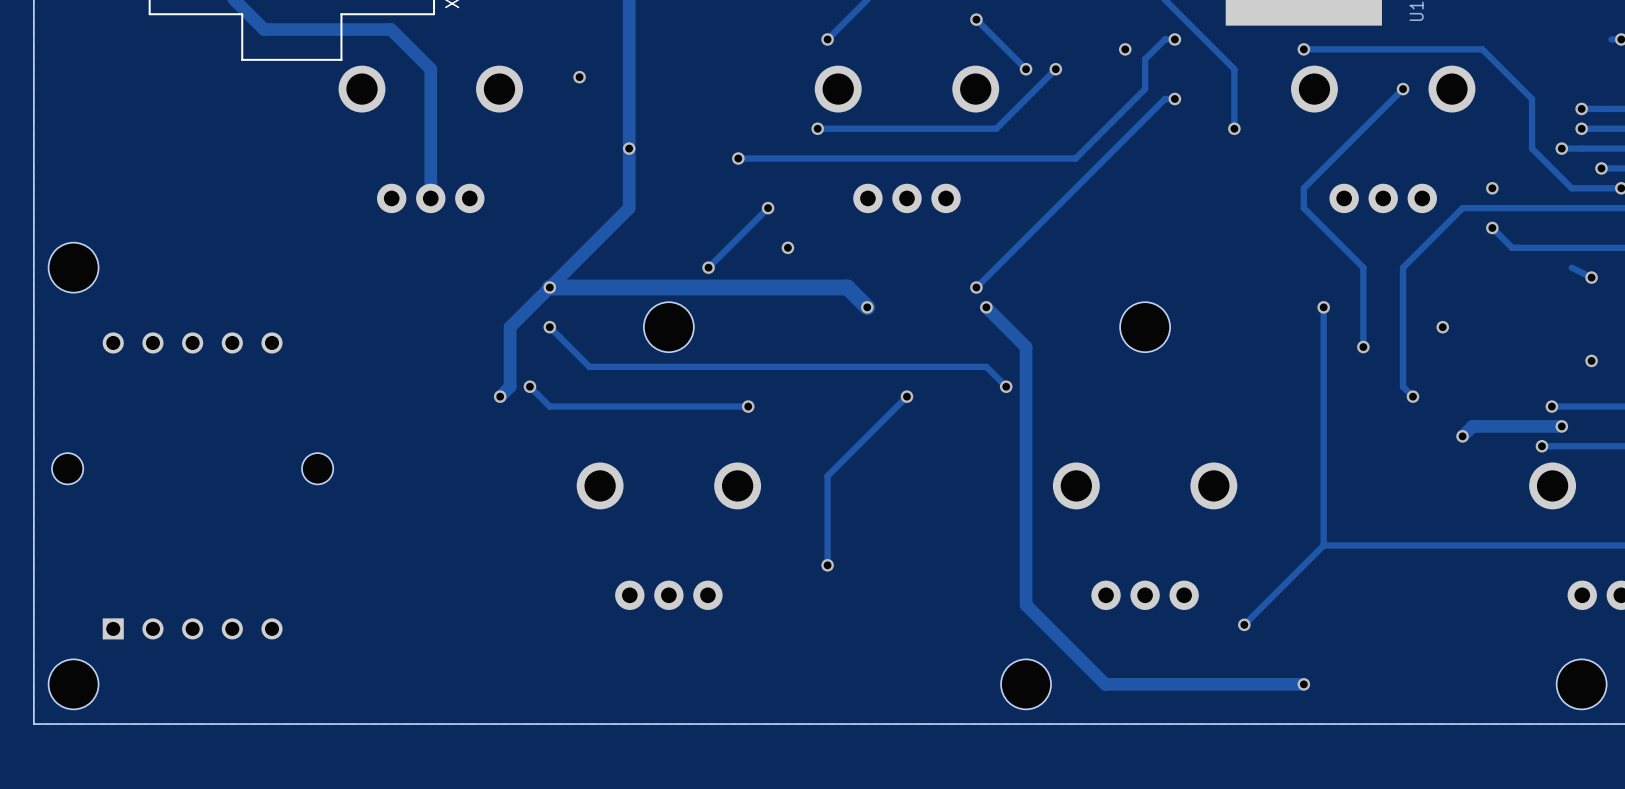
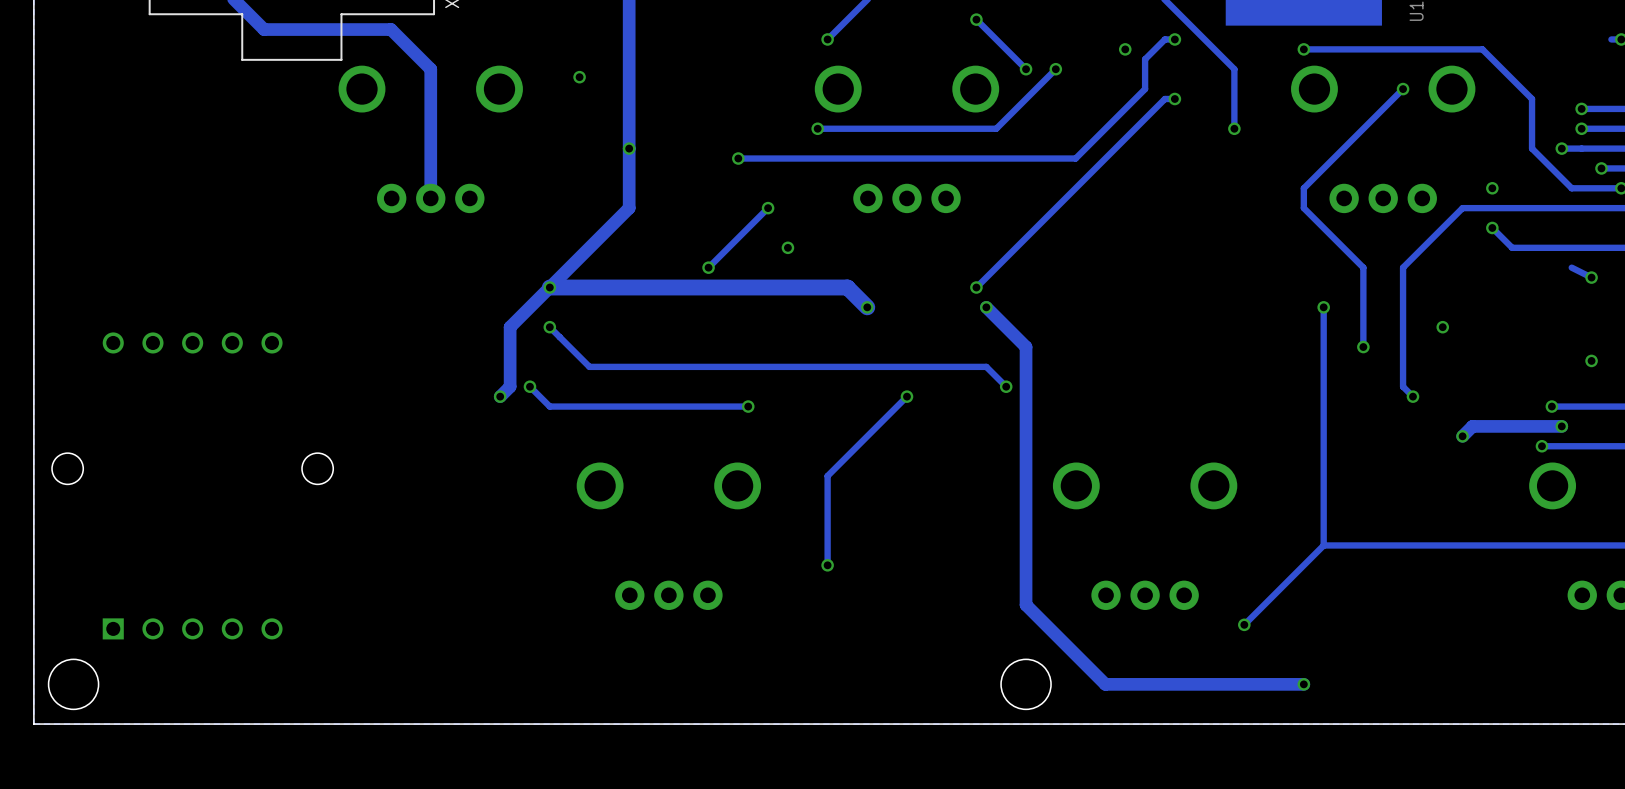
hole: (73, 267) -> none
hole: (668, 327) -> none
hole: (1145, 327) -> none
hole: (1581, 684) -> none

